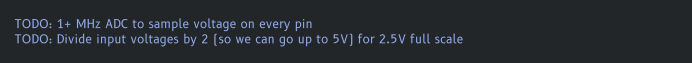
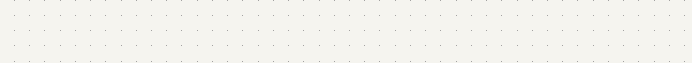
text: TODO: 1+ MHz ADC to sample voltage on every pin (163, 24) -> none
text: TODO: Divide input voltages by 2 (so we can go up to 5V) for 2.5V full scale (238, 40) -> none

